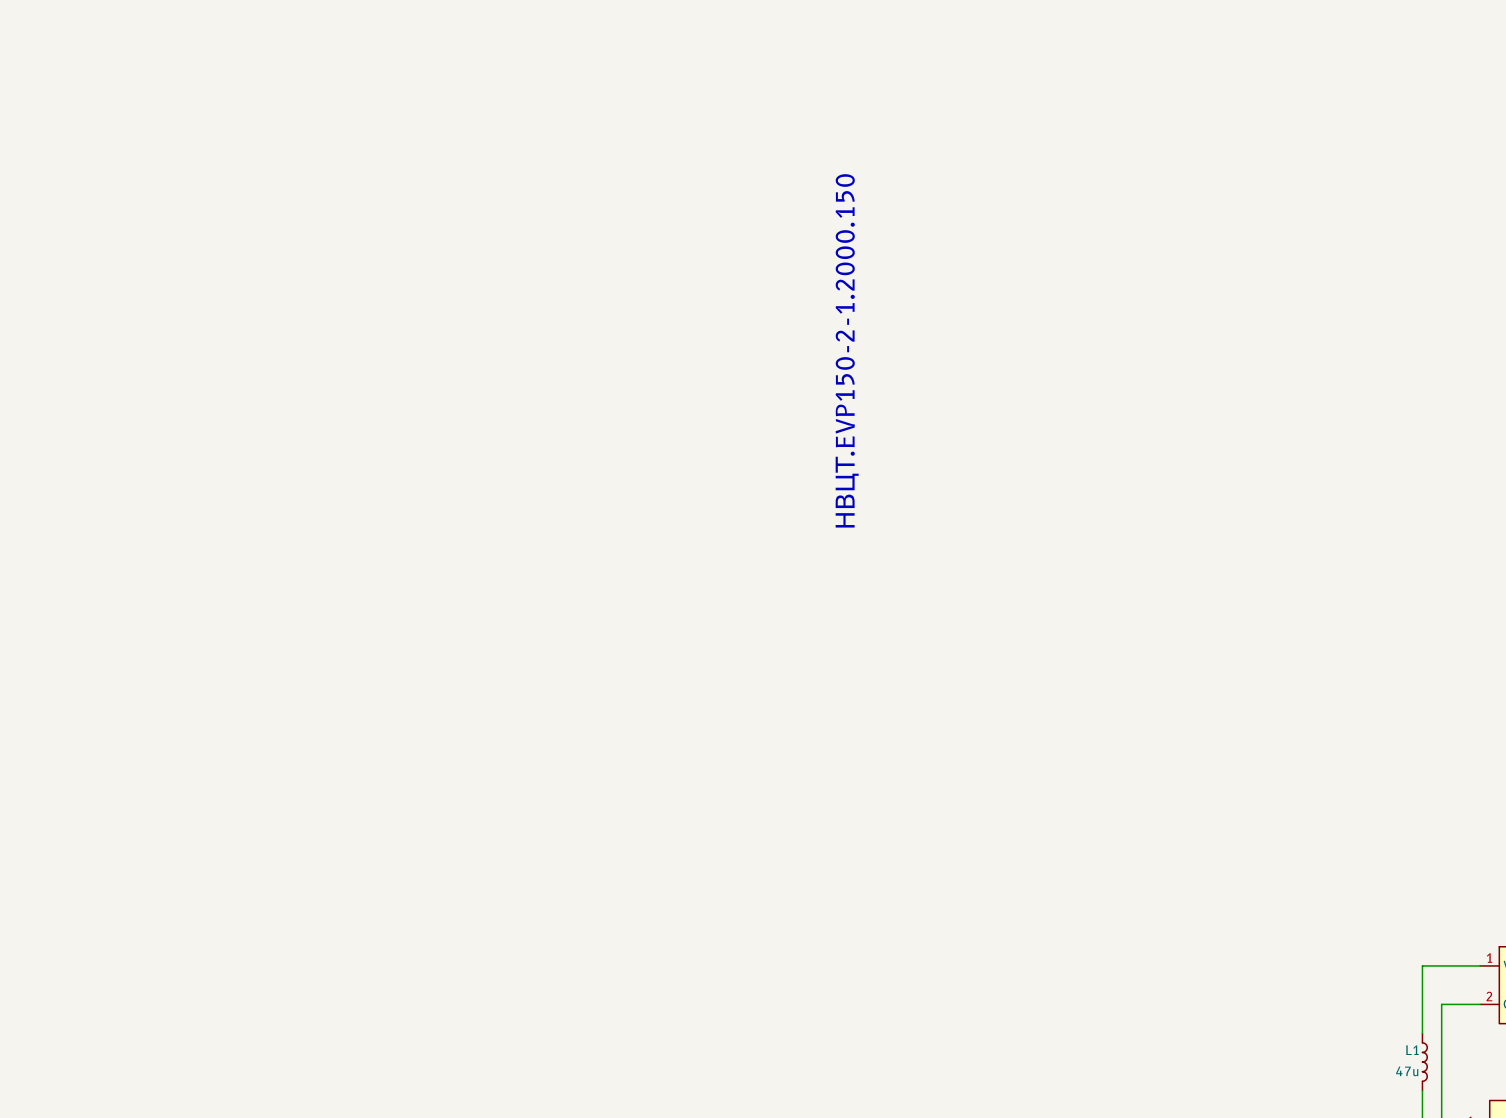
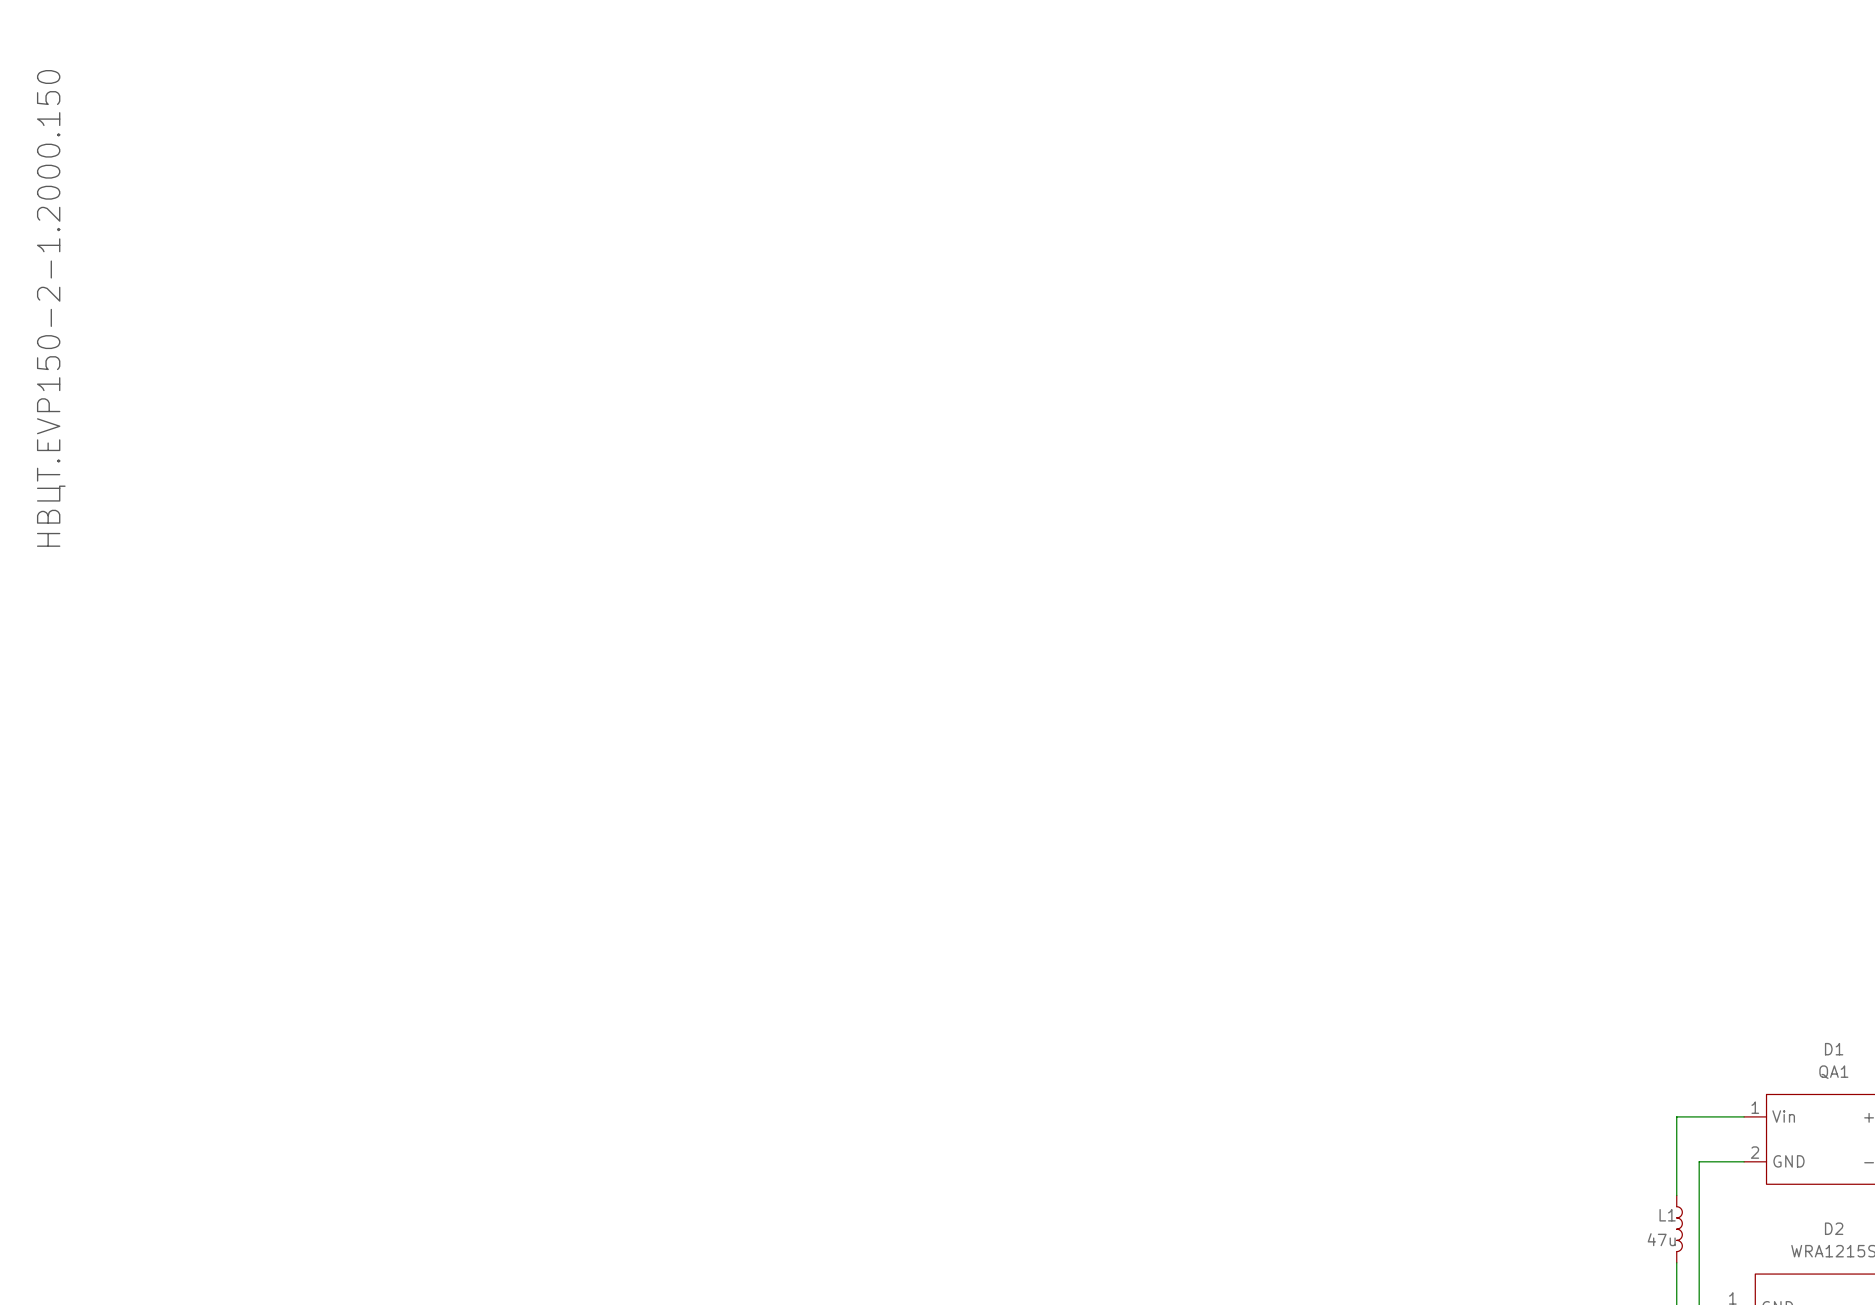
text: none -> НВЦТ.EVP150-2-1.2000.150 (51, 308)
text: НВЦТ.EVP150-2-1.2000.150 (847, 350) -> none

